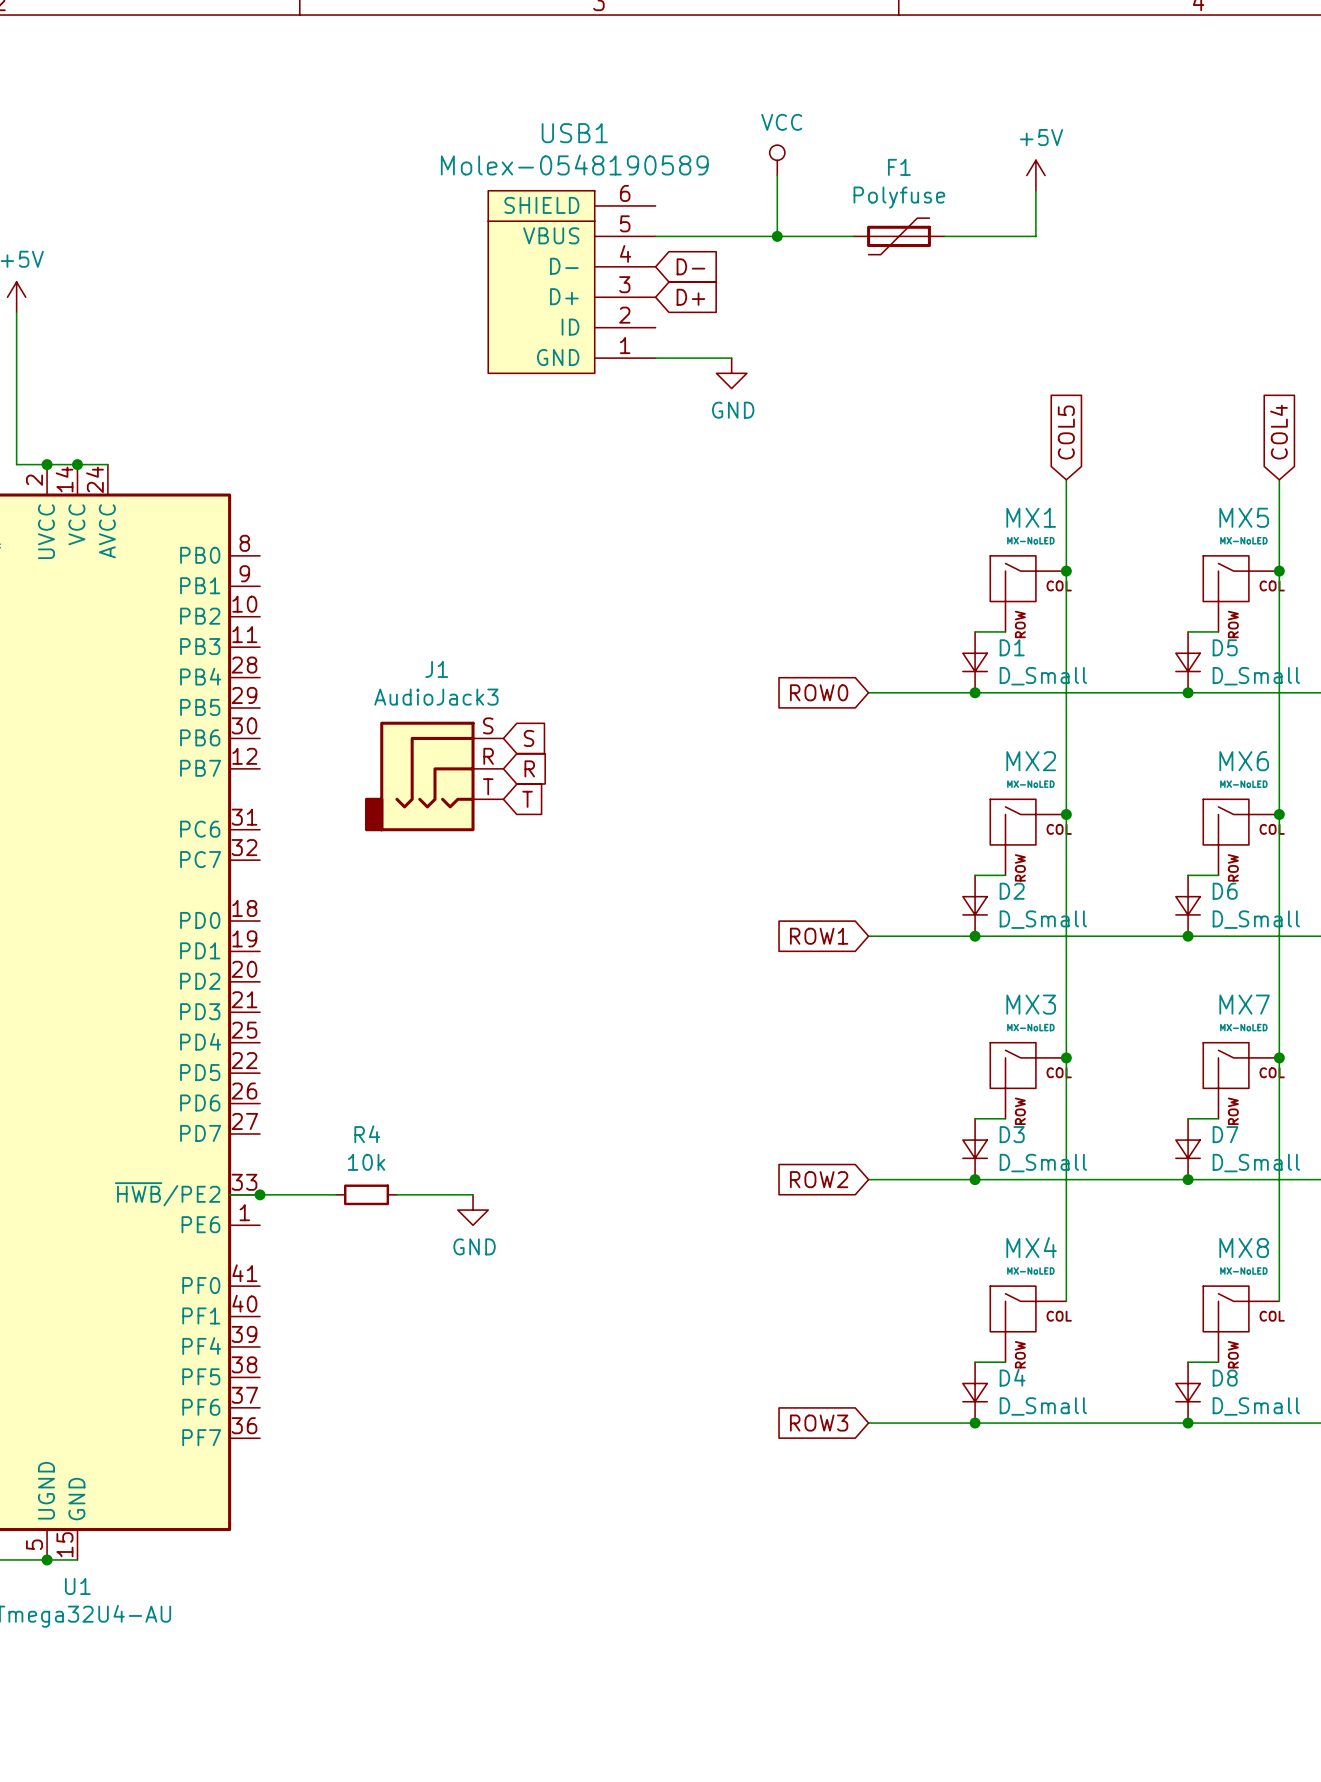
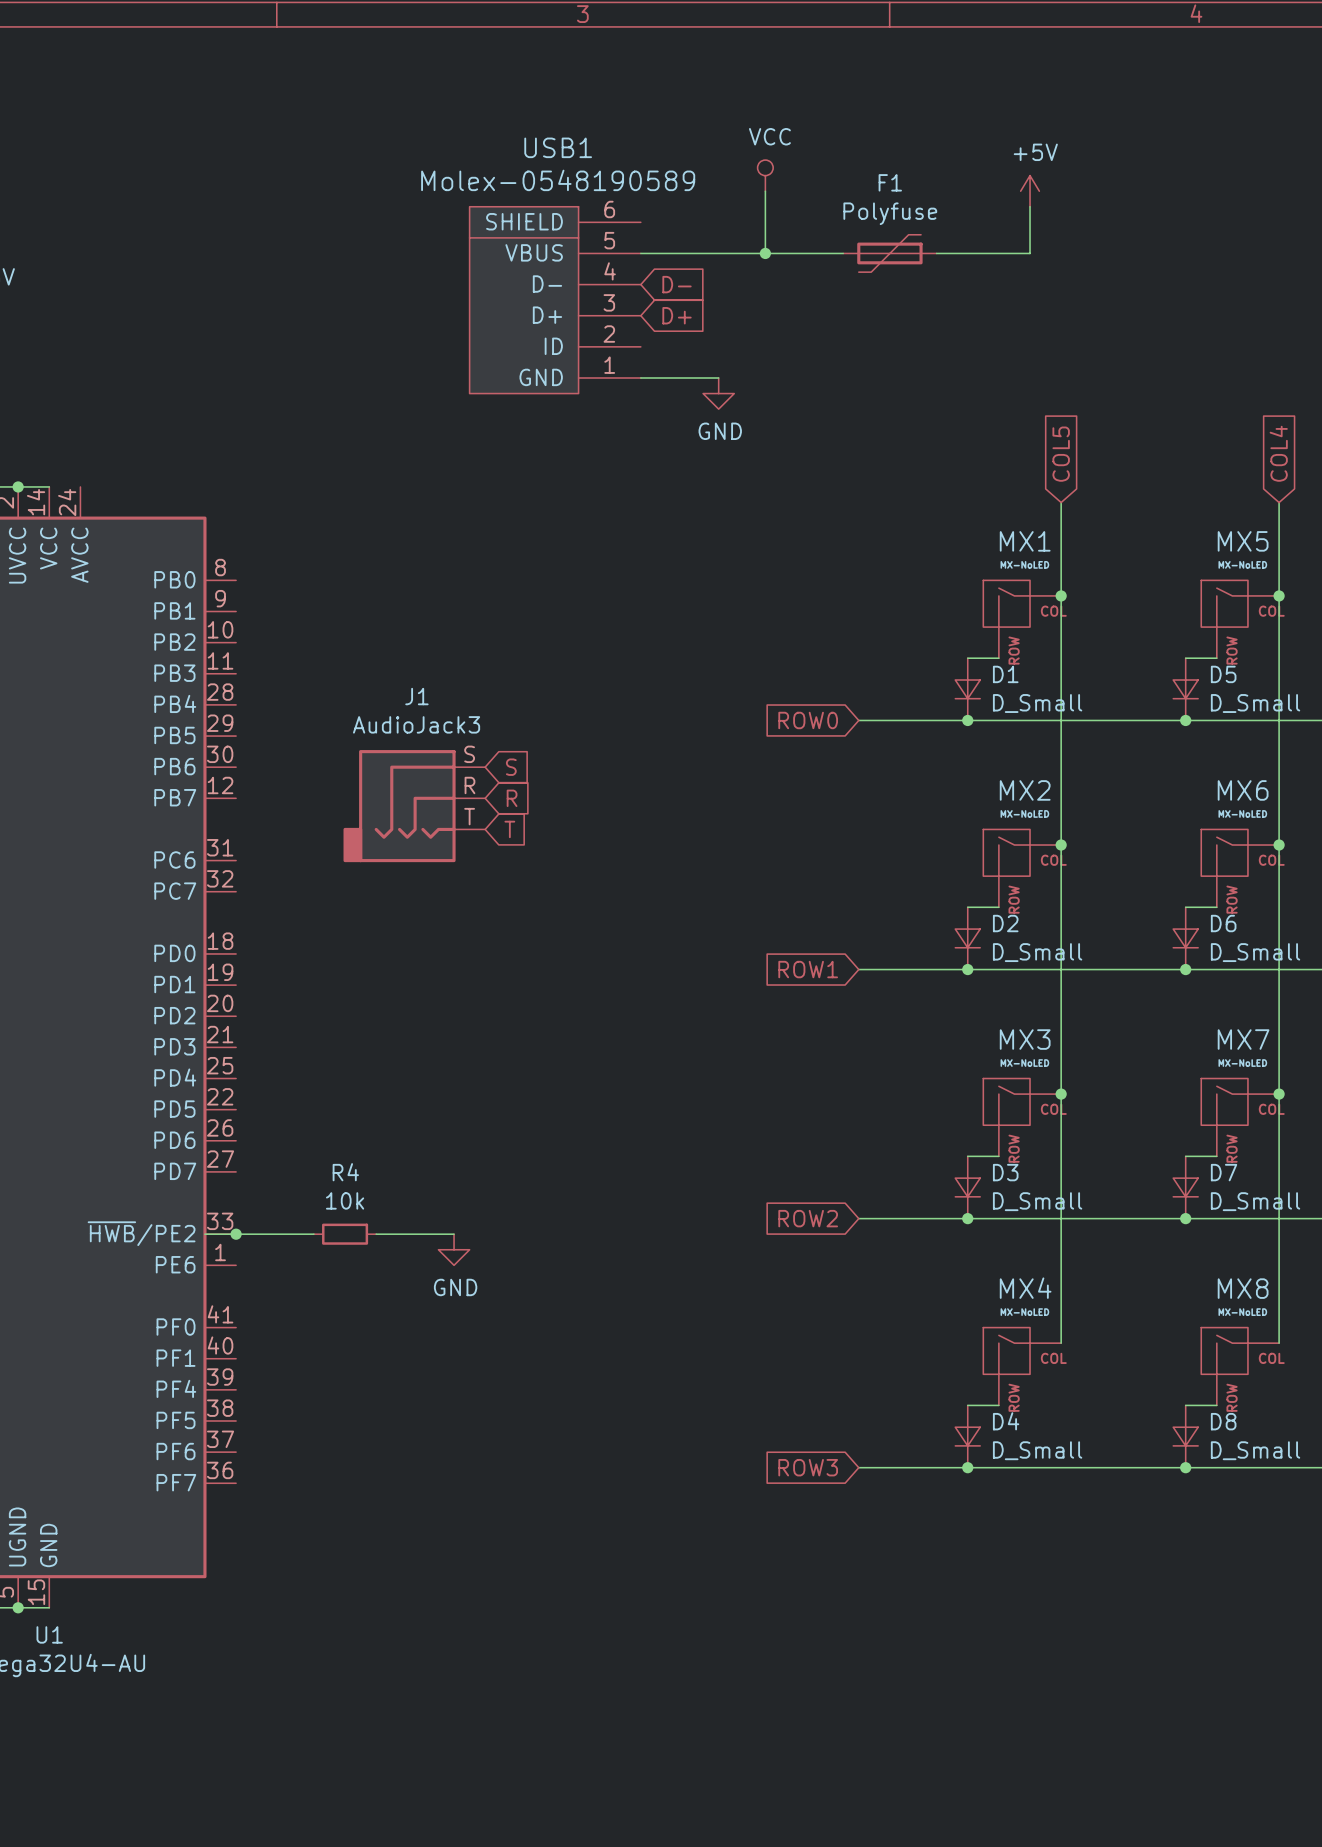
wire: (77, 464) (107, 464) -> none
junction: (77, 464) -> none

